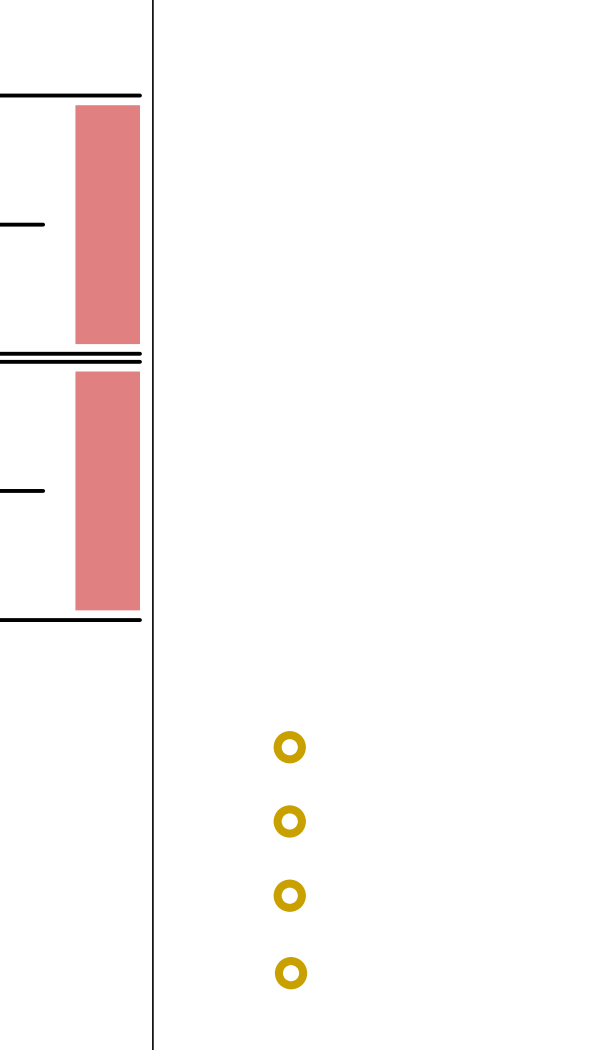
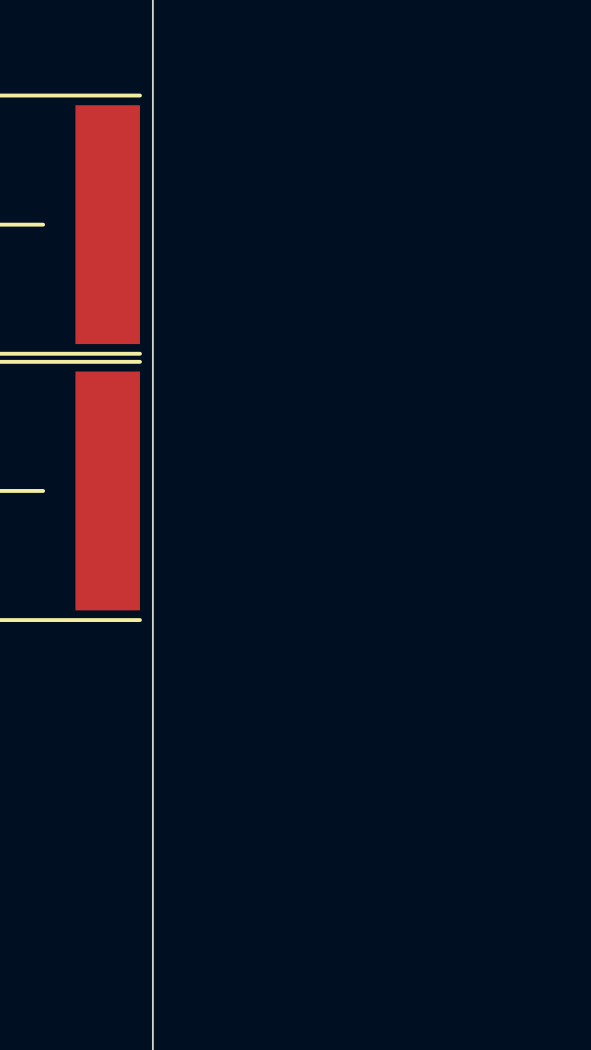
part: (289, 747) -> none
part: (289, 821) -> none
part: (289, 895) -> none
part: (291, 973) -> none

